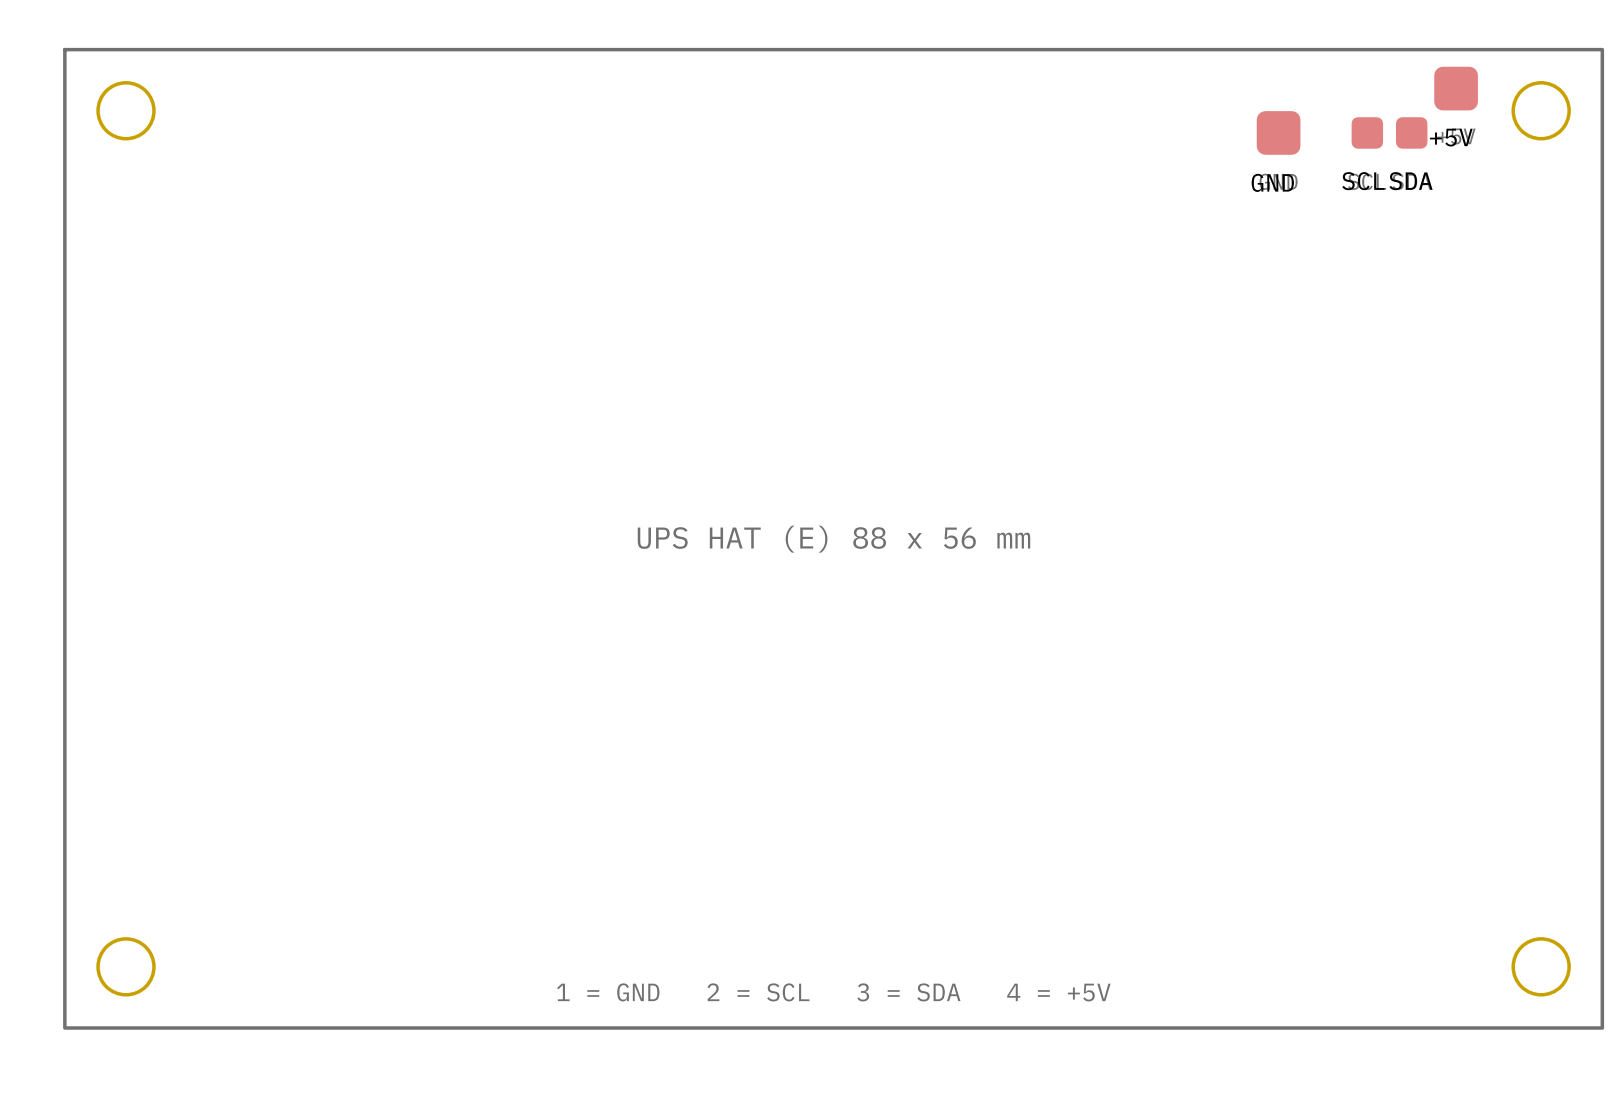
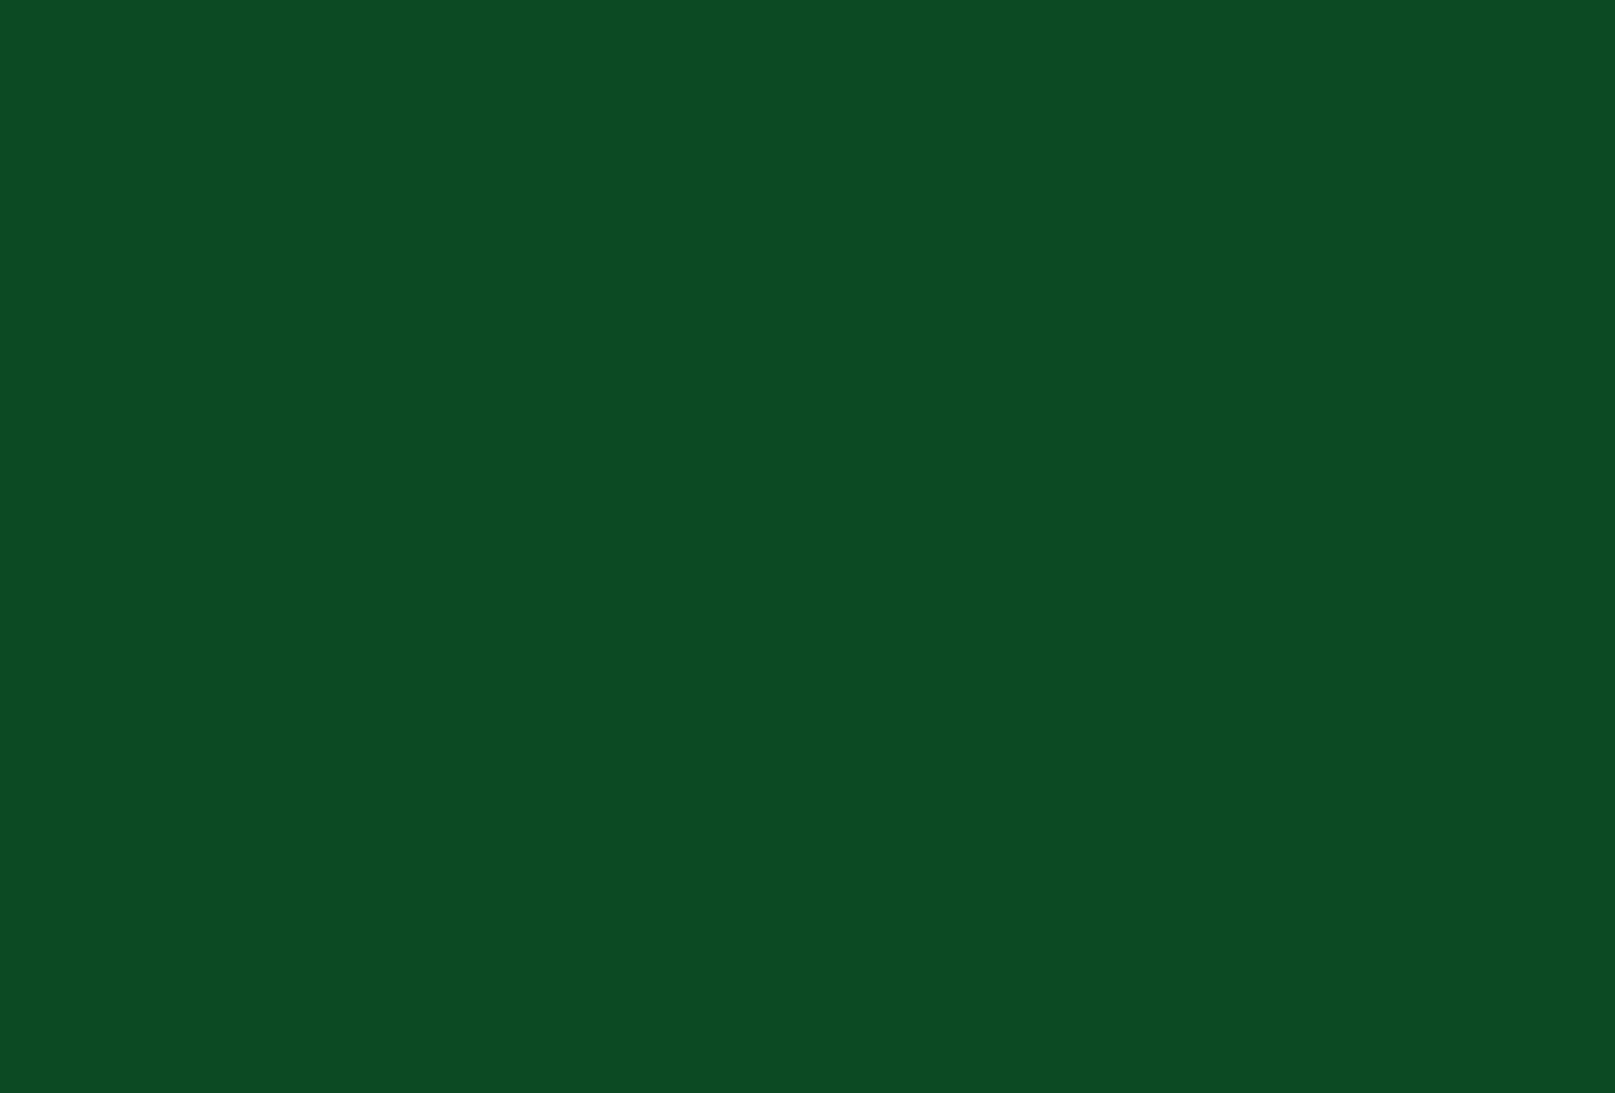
text: +5V (1451, 137) -> none
text: SCL (1363, 181) -> none
text: SDA (1411, 181) -> none
text: GND (1272, 182) -> none
part: (833, 538) -> none

